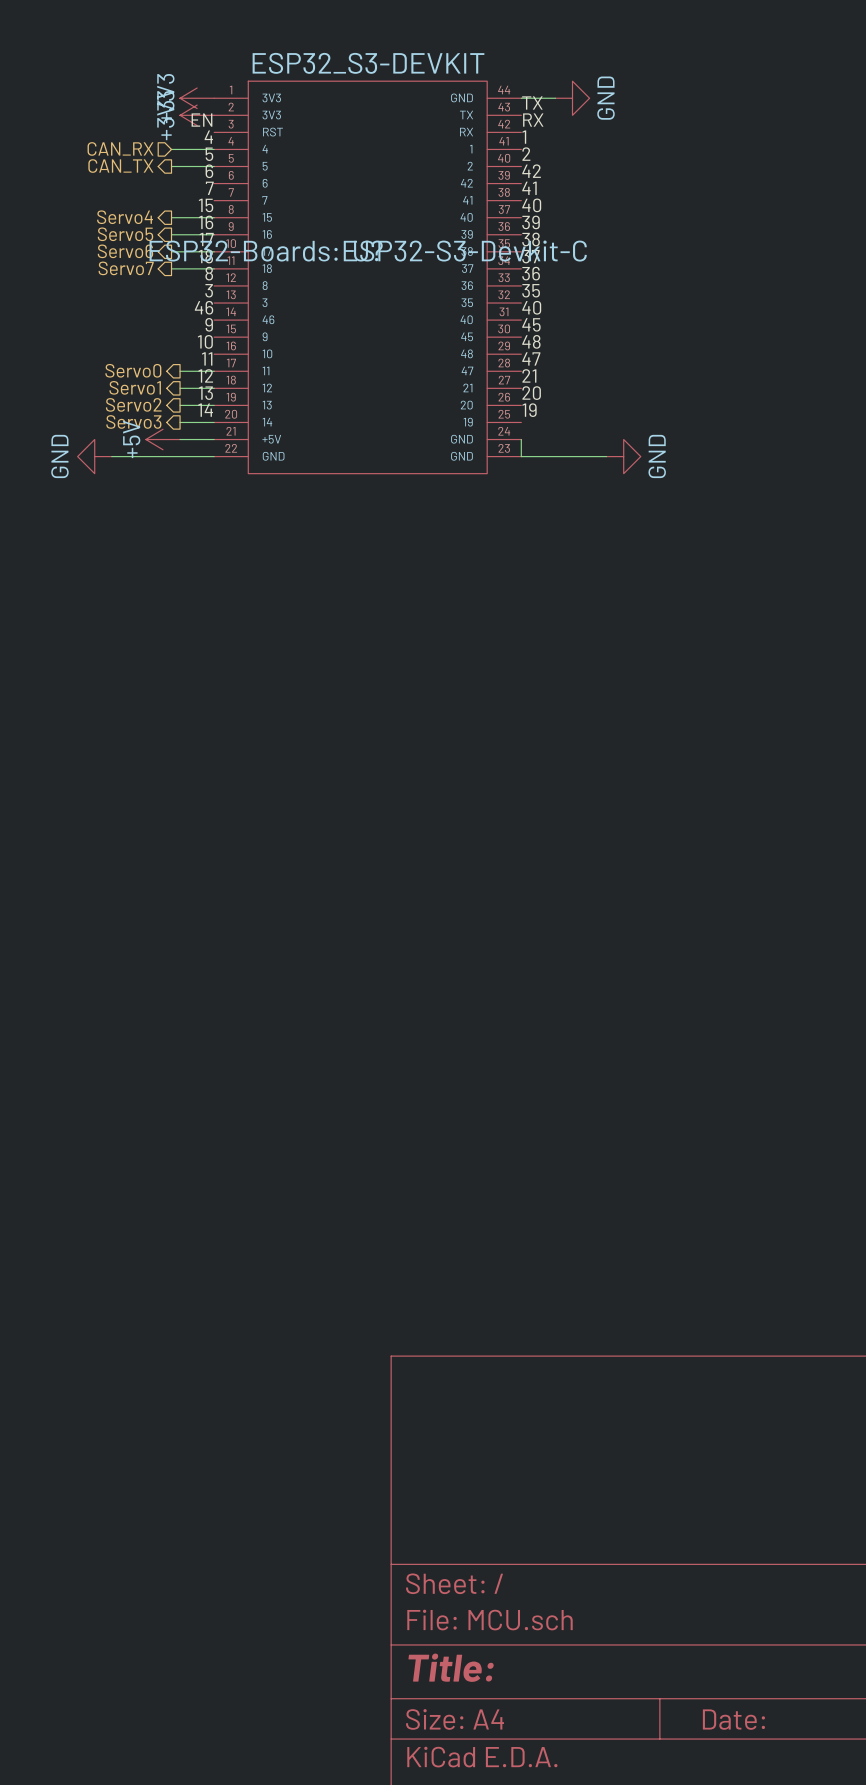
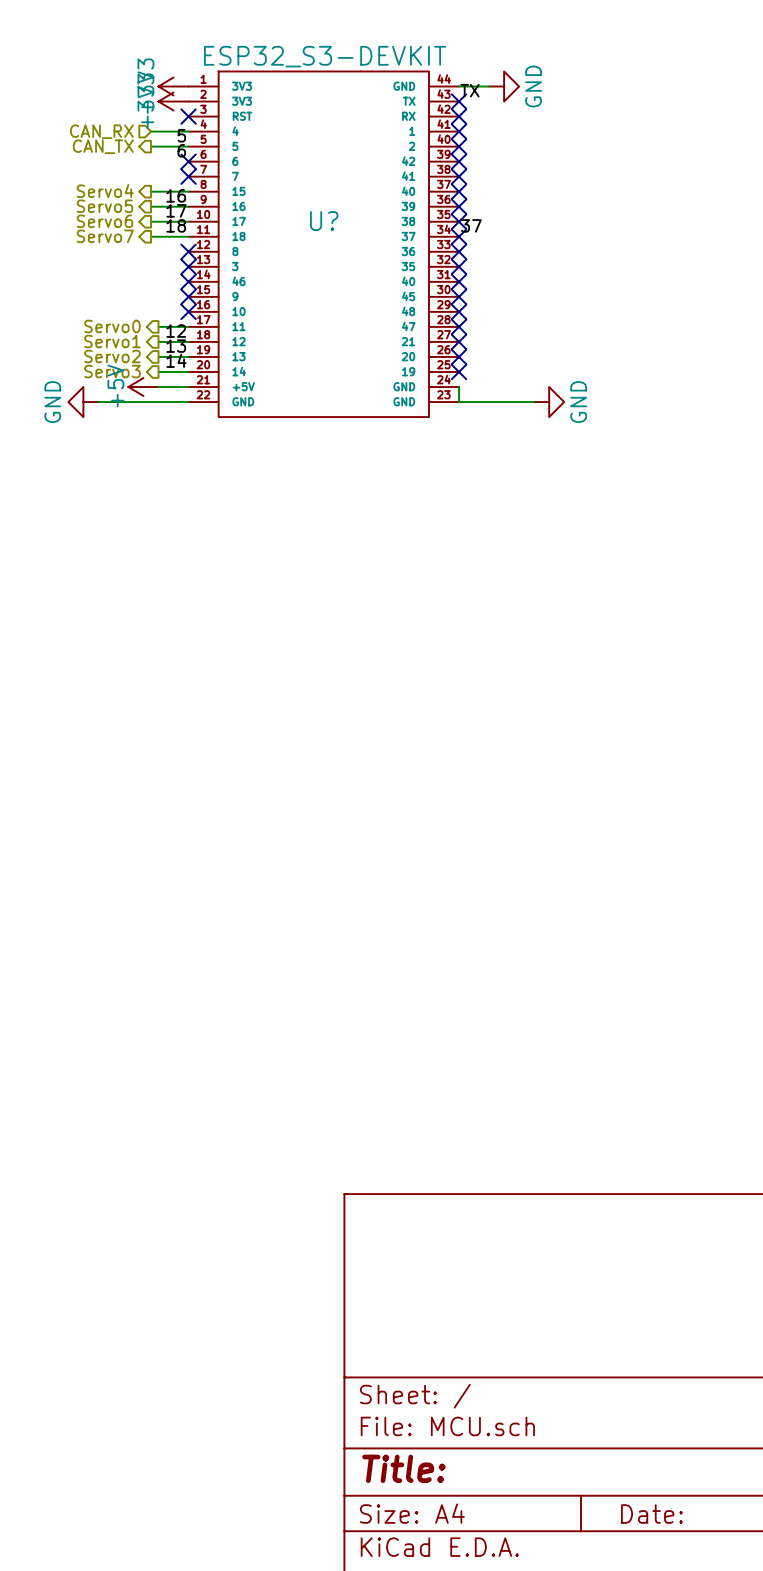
no-connect mark: none -> (459, 101)
label: EN (201, 120) -> none
label: RX (533, 120) -> none
no-connect mark: none -> (188, 116)
no-connect mark: none -> (459, 116)
label: 4 (208, 137) -> none
label: 1 (524, 137) -> none
no-connect mark: none -> (459, 131)
label: 2 (526, 154) -> none
no-connect mark: none -> (459, 146)
label: 42 (531, 171) -> none
no-connect mark: none -> (188, 161)
no-connect mark: none -> (459, 161)
label: 7 (209, 188) -> none
label: 41 (529, 188) -> none
no-connect mark: none -> (188, 176)
no-connect mark: none -> (459, 176)
label: 15 (206, 205) -> none
label: 40 (531, 205) -> none
no-connect mark: none -> (459, 191)
label: 39 (531, 222) -> none
no-connect mark: none -> (459, 206)
label: 38 (531, 239) -> none
U? text: ESP32-Boards:ESP32-S3-Devkit-C (368, 251) -> none
no-connect mark: none -> (459, 221)
no-connect mark: none -> (459, 236)
label: 8 (209, 273) -> none
label: 36 (531, 273) -> none
no-connect mark: none -> (188, 251)
no-connect mark: none -> (459, 251)
label: 3 (209, 290) -> none
label: 35 (531, 290) -> none
no-connect mark: none -> (188, 266)
no-connect mark: none -> (459, 266)
label: 46 (204, 307) -> none
label: 40 (531, 307) -> none
no-connect mark: none -> (188, 281)
no-connect mark: none -> (459, 281)
label: 9 (209, 324) -> none
label: 45 (531, 324) -> none
no-connect mark: none -> (188, 296)
no-connect mark: none -> (459, 296)
label: 10 (205, 341) -> none
label: 48 (531, 341) -> none
no-connect mark: none -> (188, 311)
no-connect mark: none -> (459, 311)
label: 11 (207, 358) -> none
label: 47 (531, 358) -> none
no-connect mark: none -> (459, 326)
label: 21 (529, 375) -> none
no-connect mark: none -> (459, 341)
label: 20 (531, 393) -> none
no-connect mark: none -> (459, 356)
label: 19 (529, 410) -> none
no-connect mark: none -> (459, 371)

